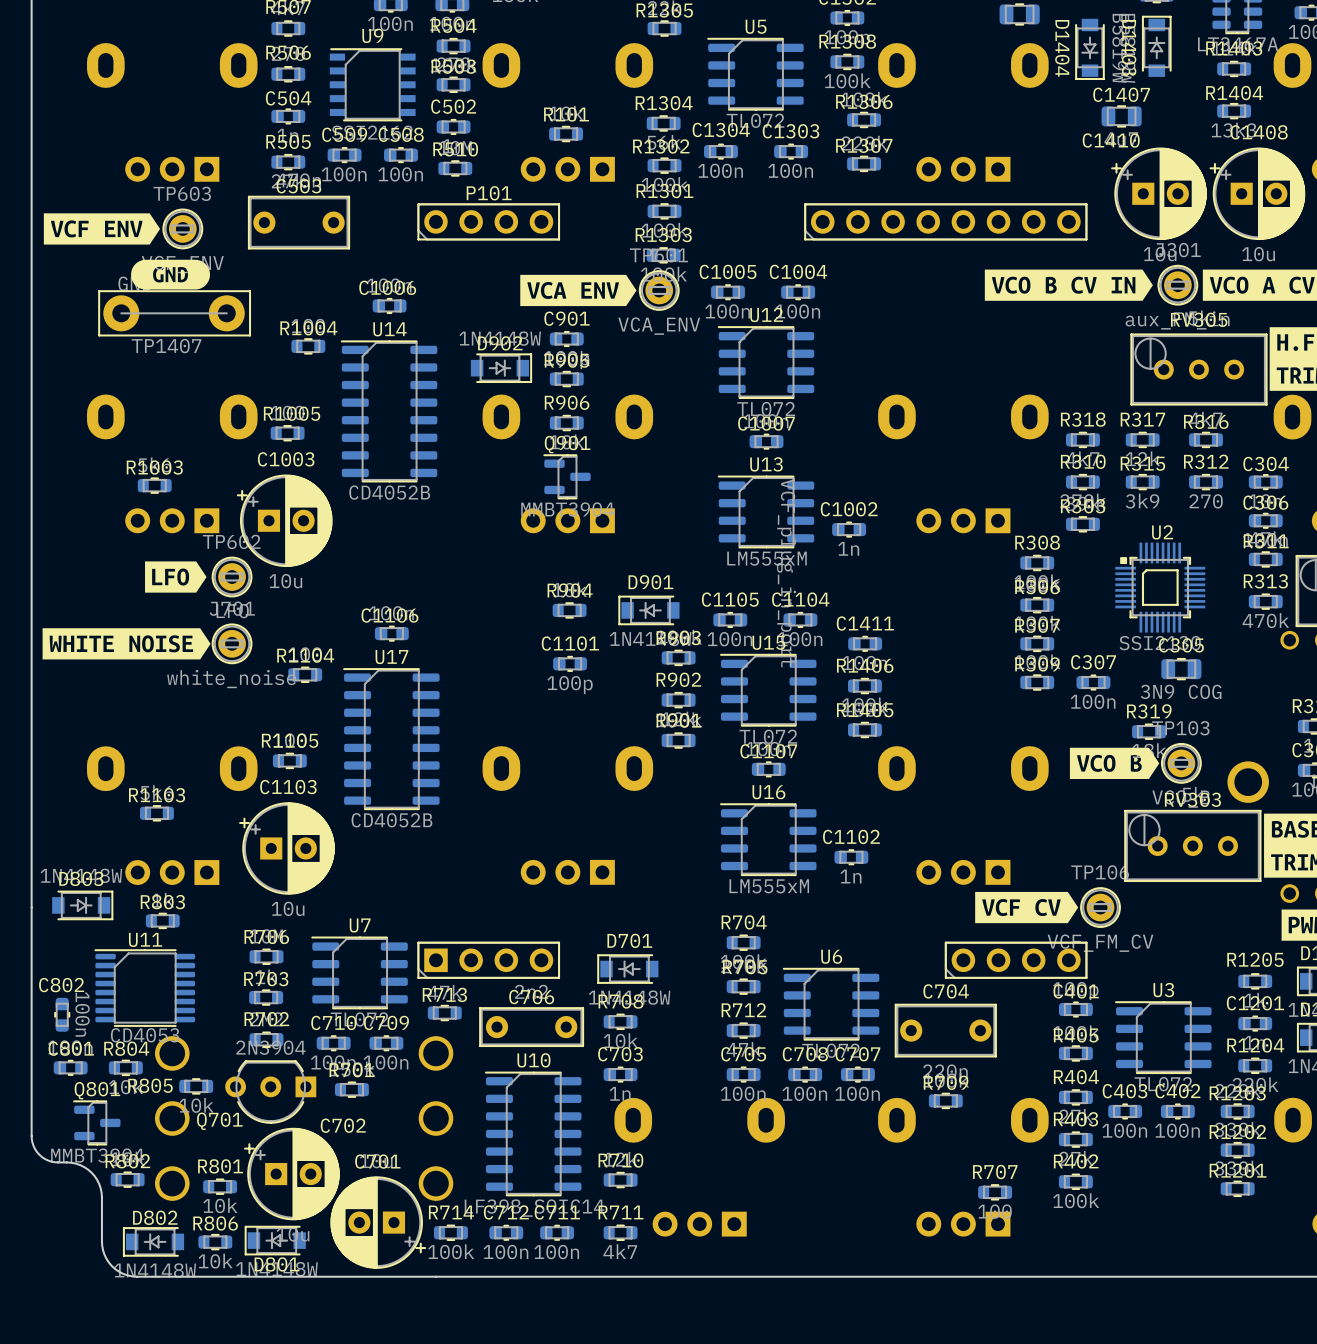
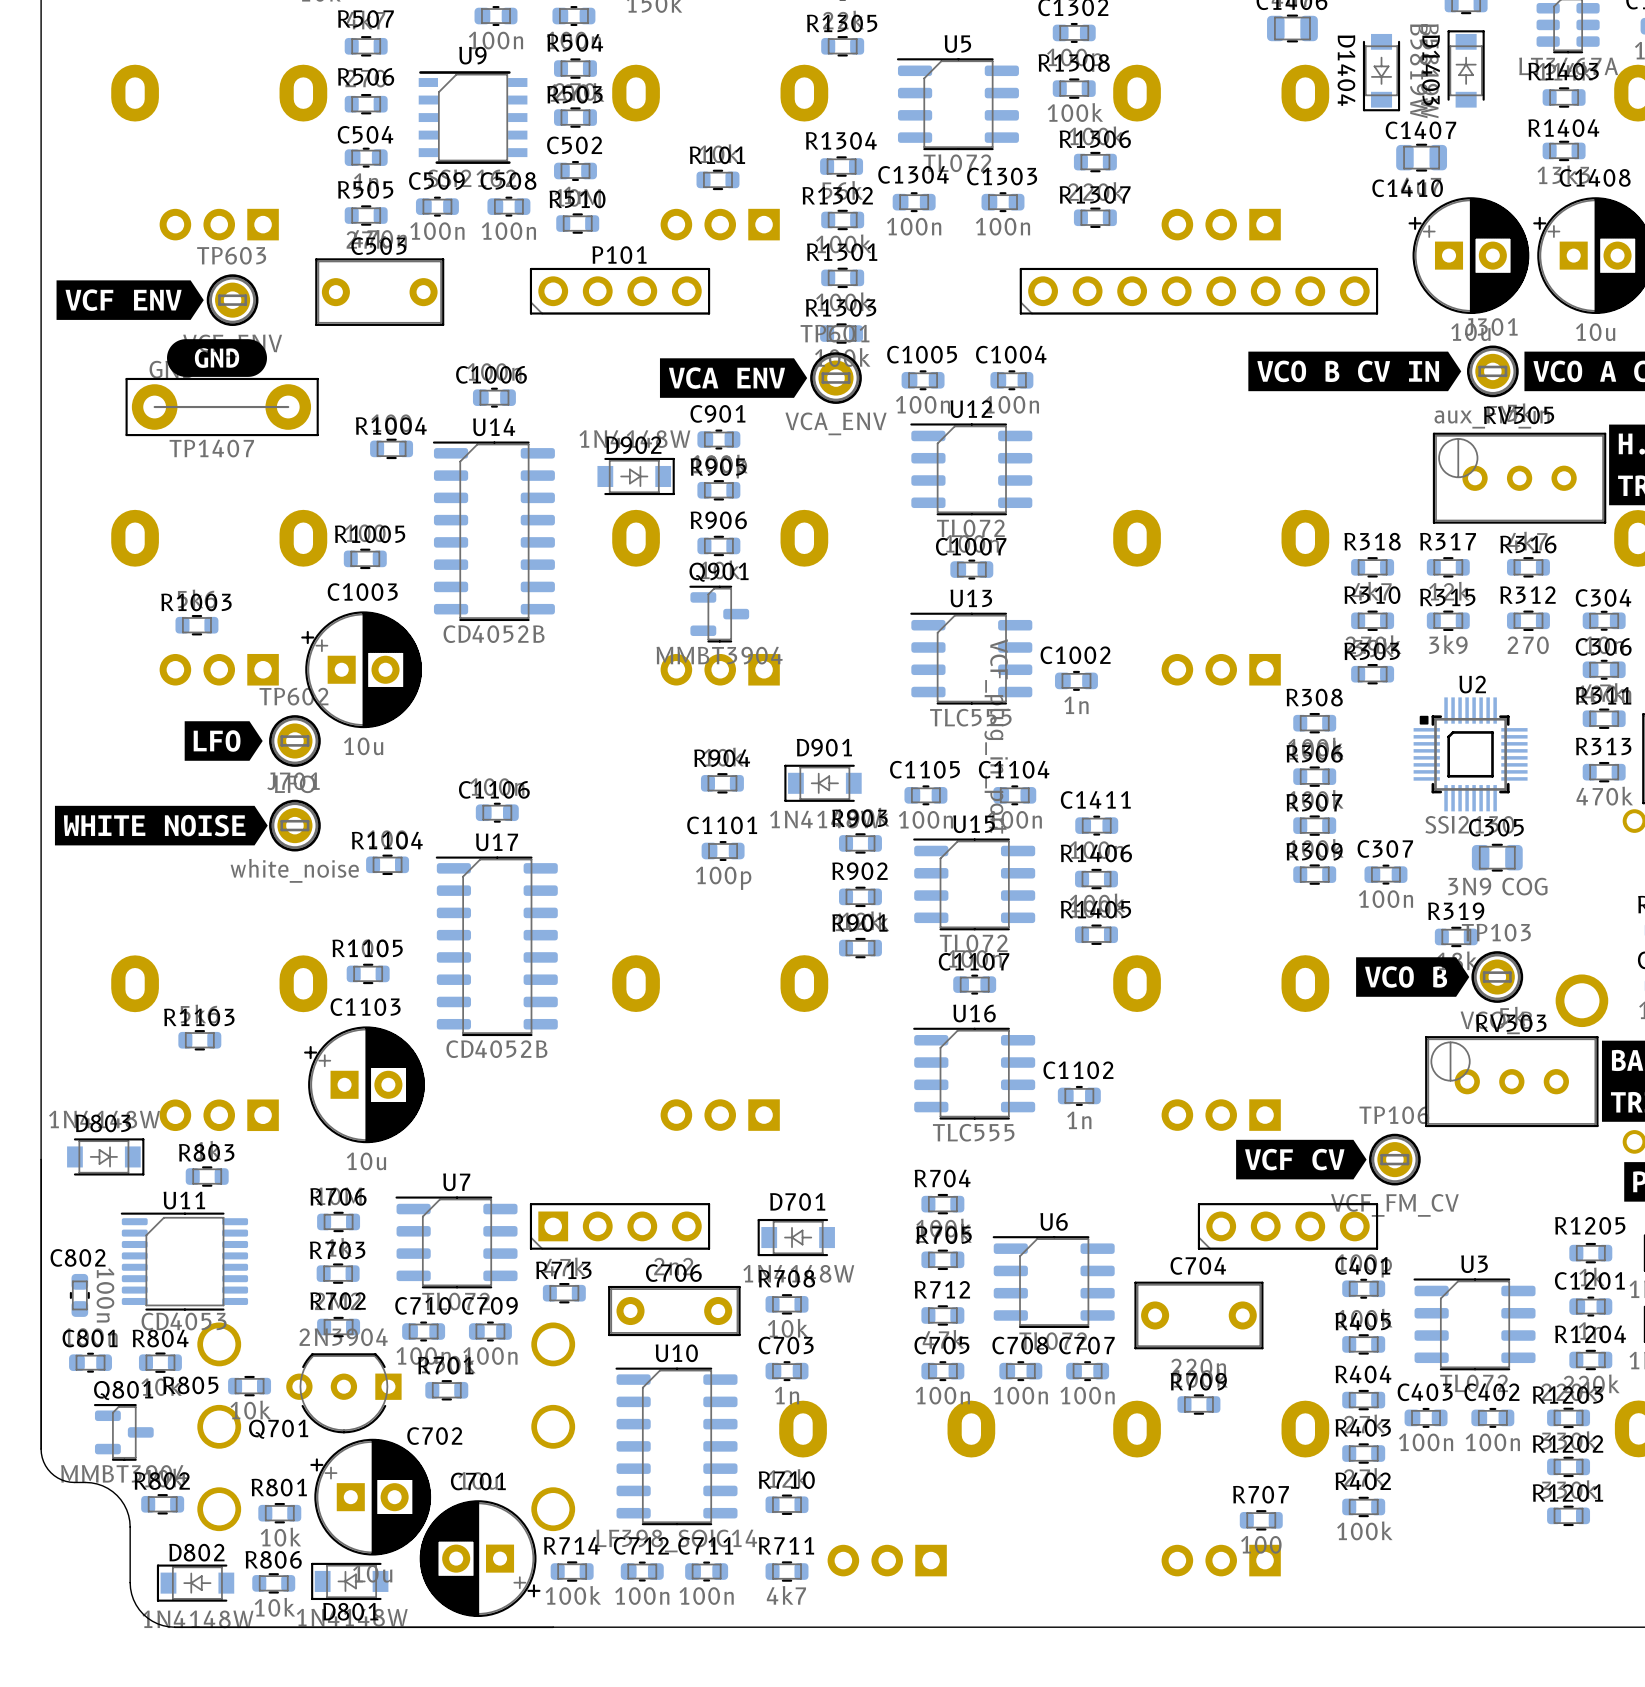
U13 value: LM555xM (767, 558) -> TLC555 (970, 717)
U16 value: LM555xM (769, 886) -> TLC555 (973, 1132)

